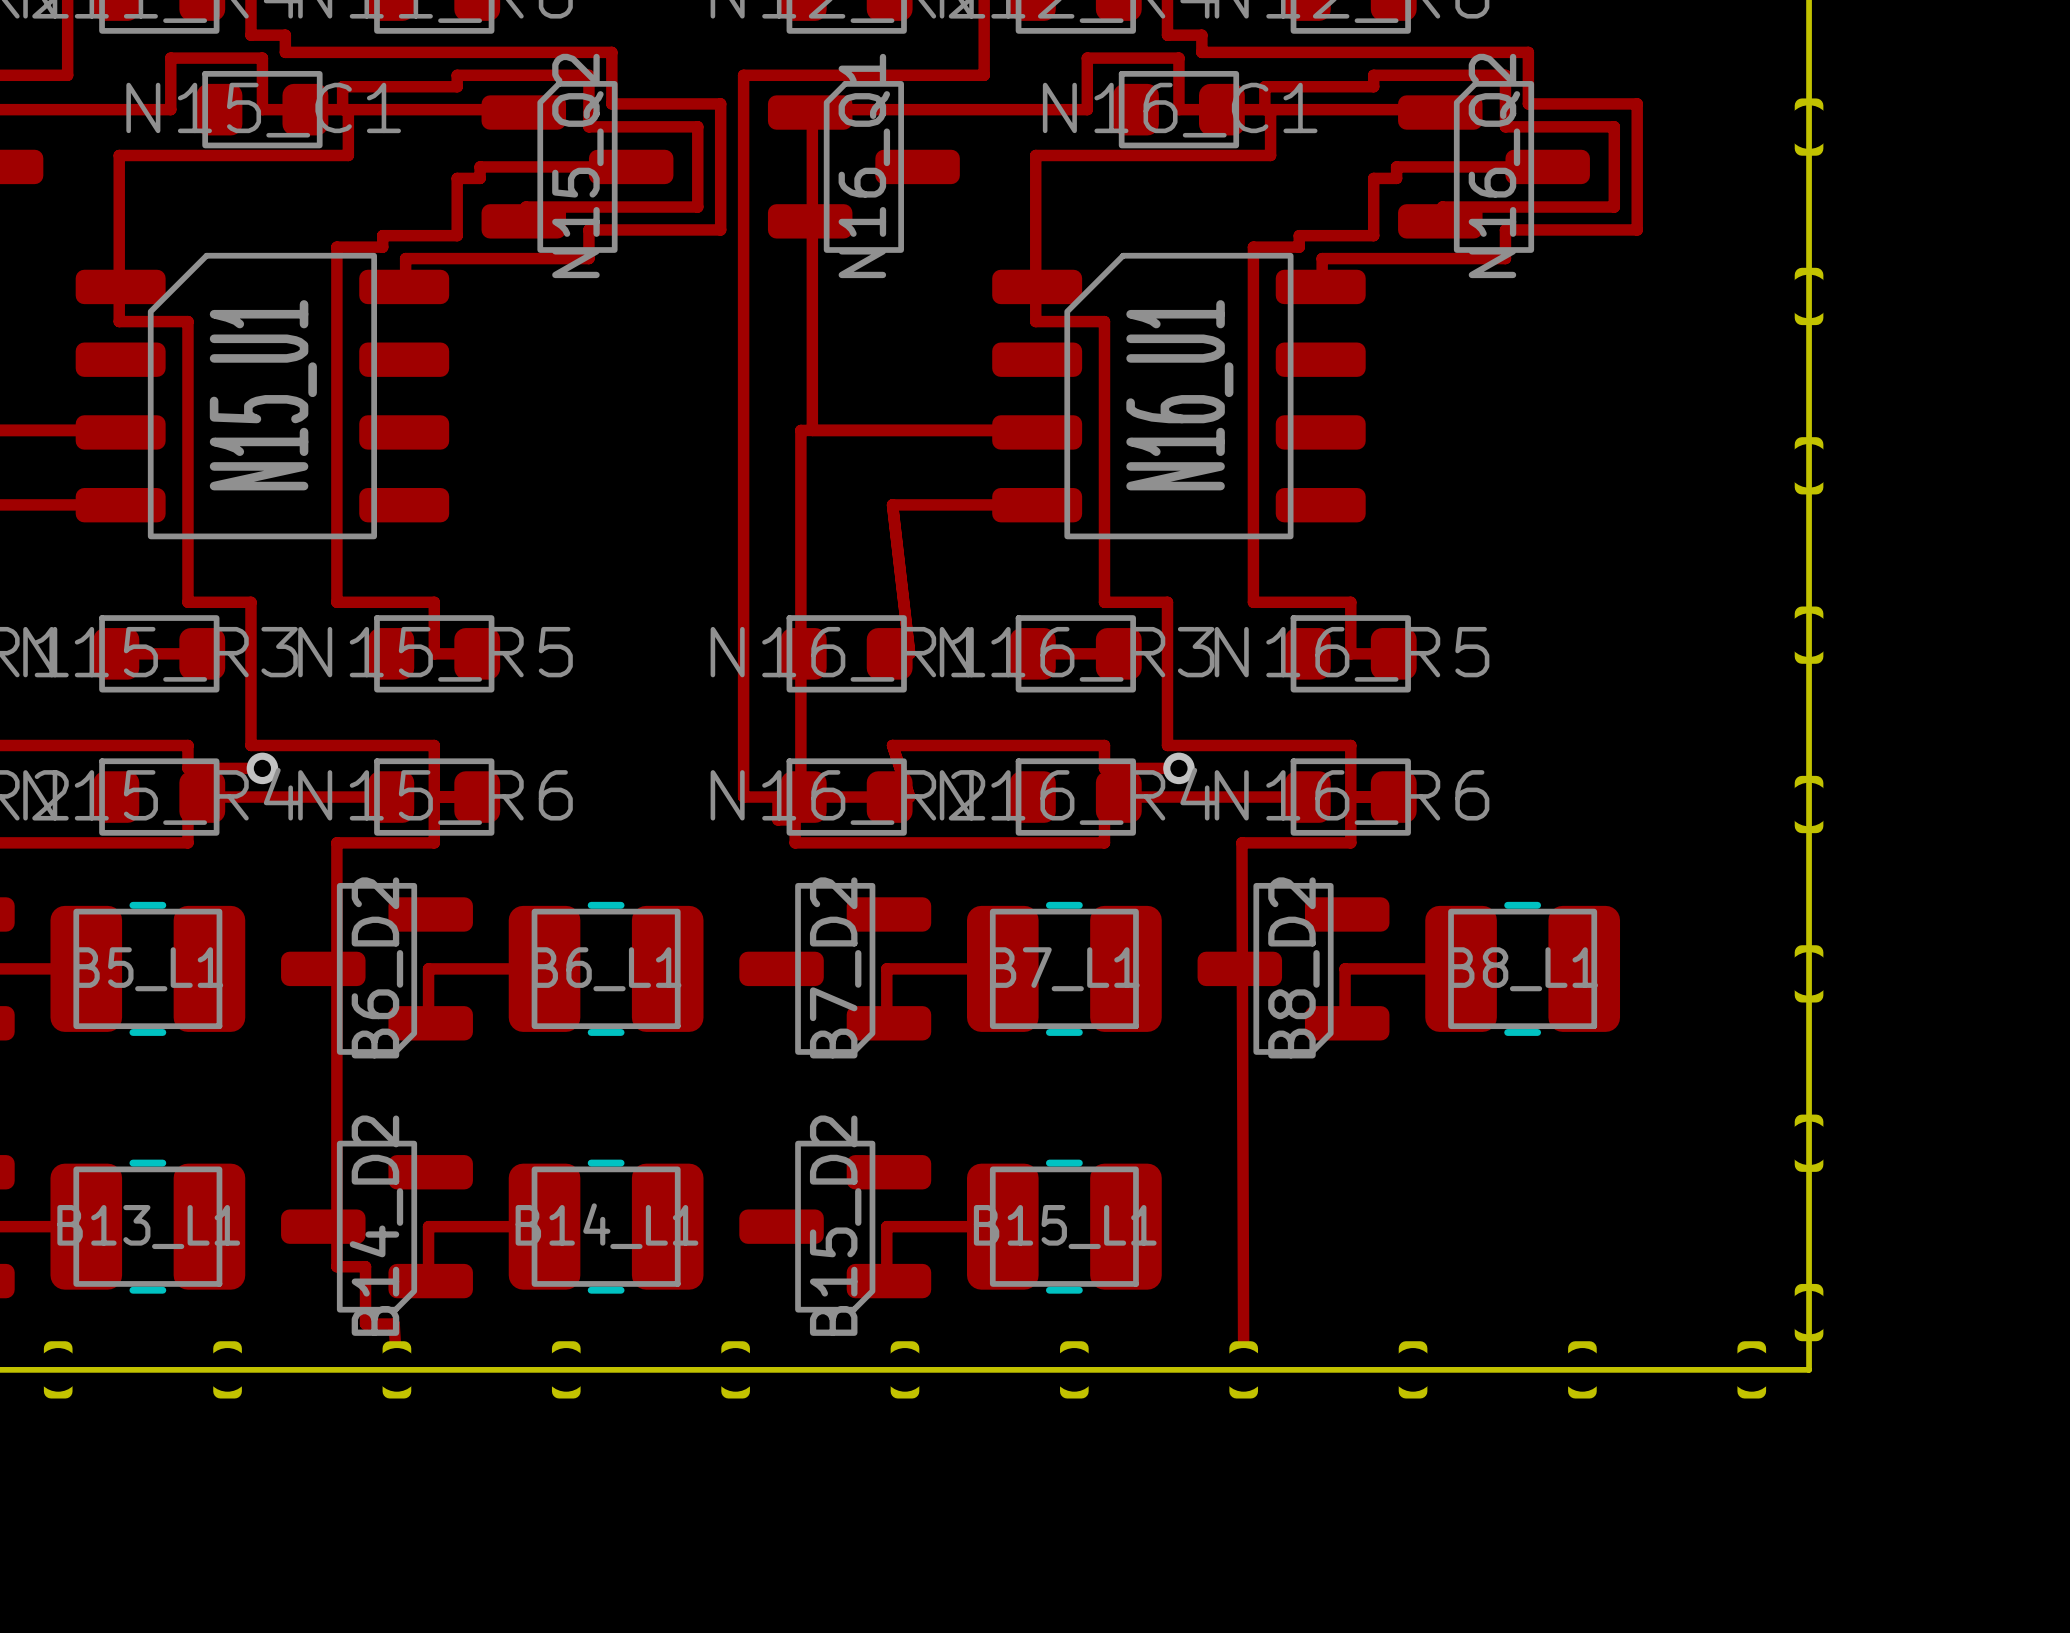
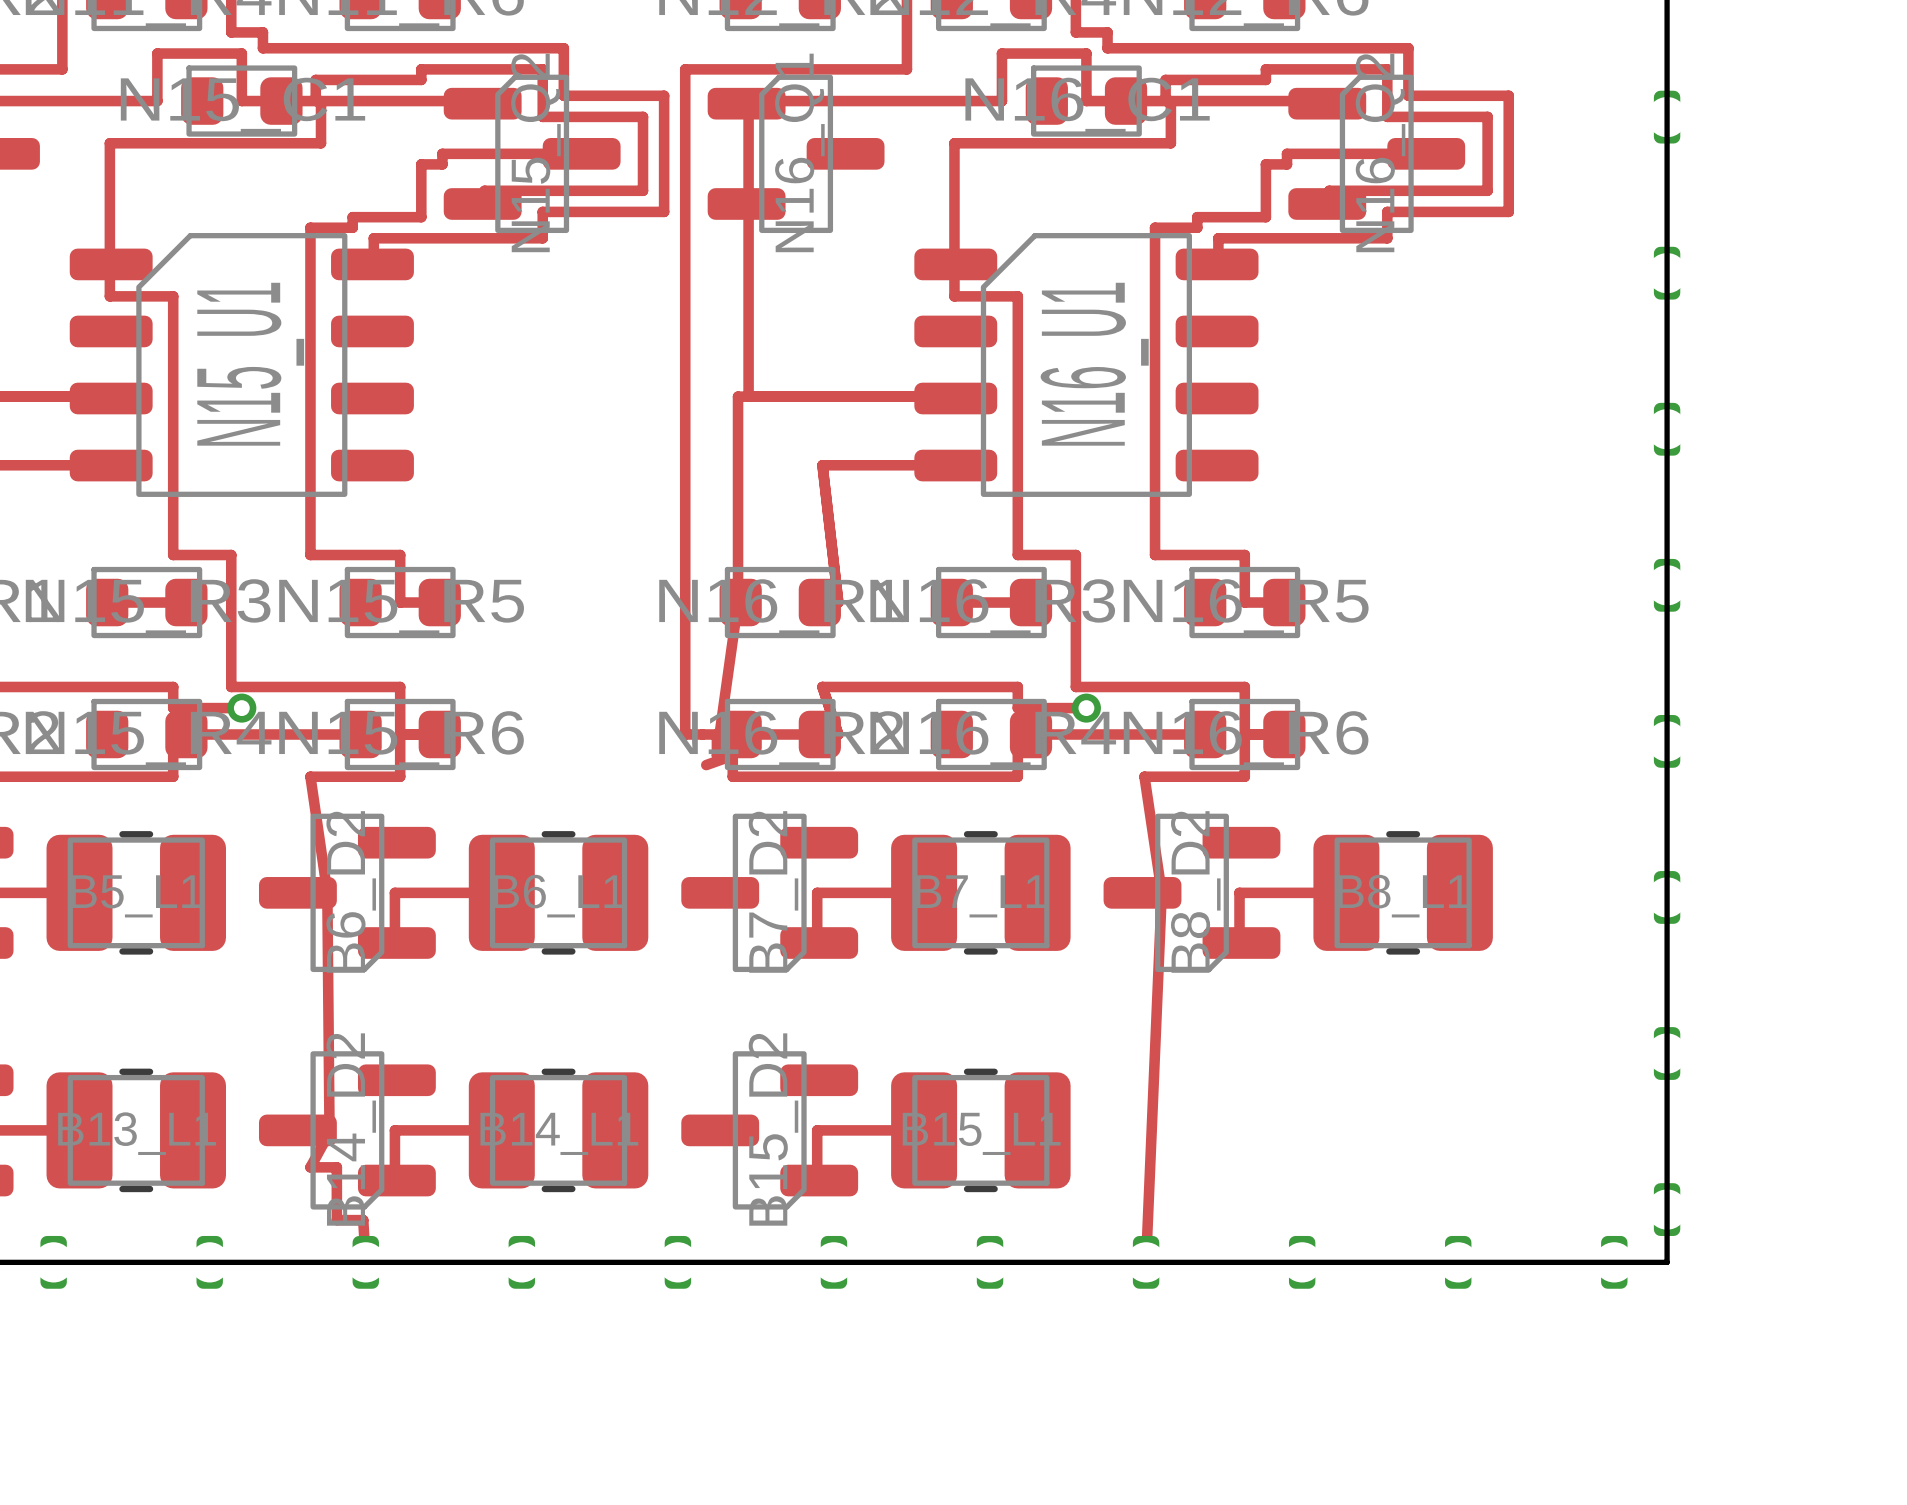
track: (800, 653) (800, 797) -> (738, 602) (719, 734) (738, 734)
track: none -> (732, 755) (706, 765)
track: (336, 842) (336, 1266) -> (310, 776) (327, 892) (329, 1132) (310, 1167)
track: (1241, 842) (1243, 1369) -> (1144, 776) (1161, 892) (1146, 1262)

